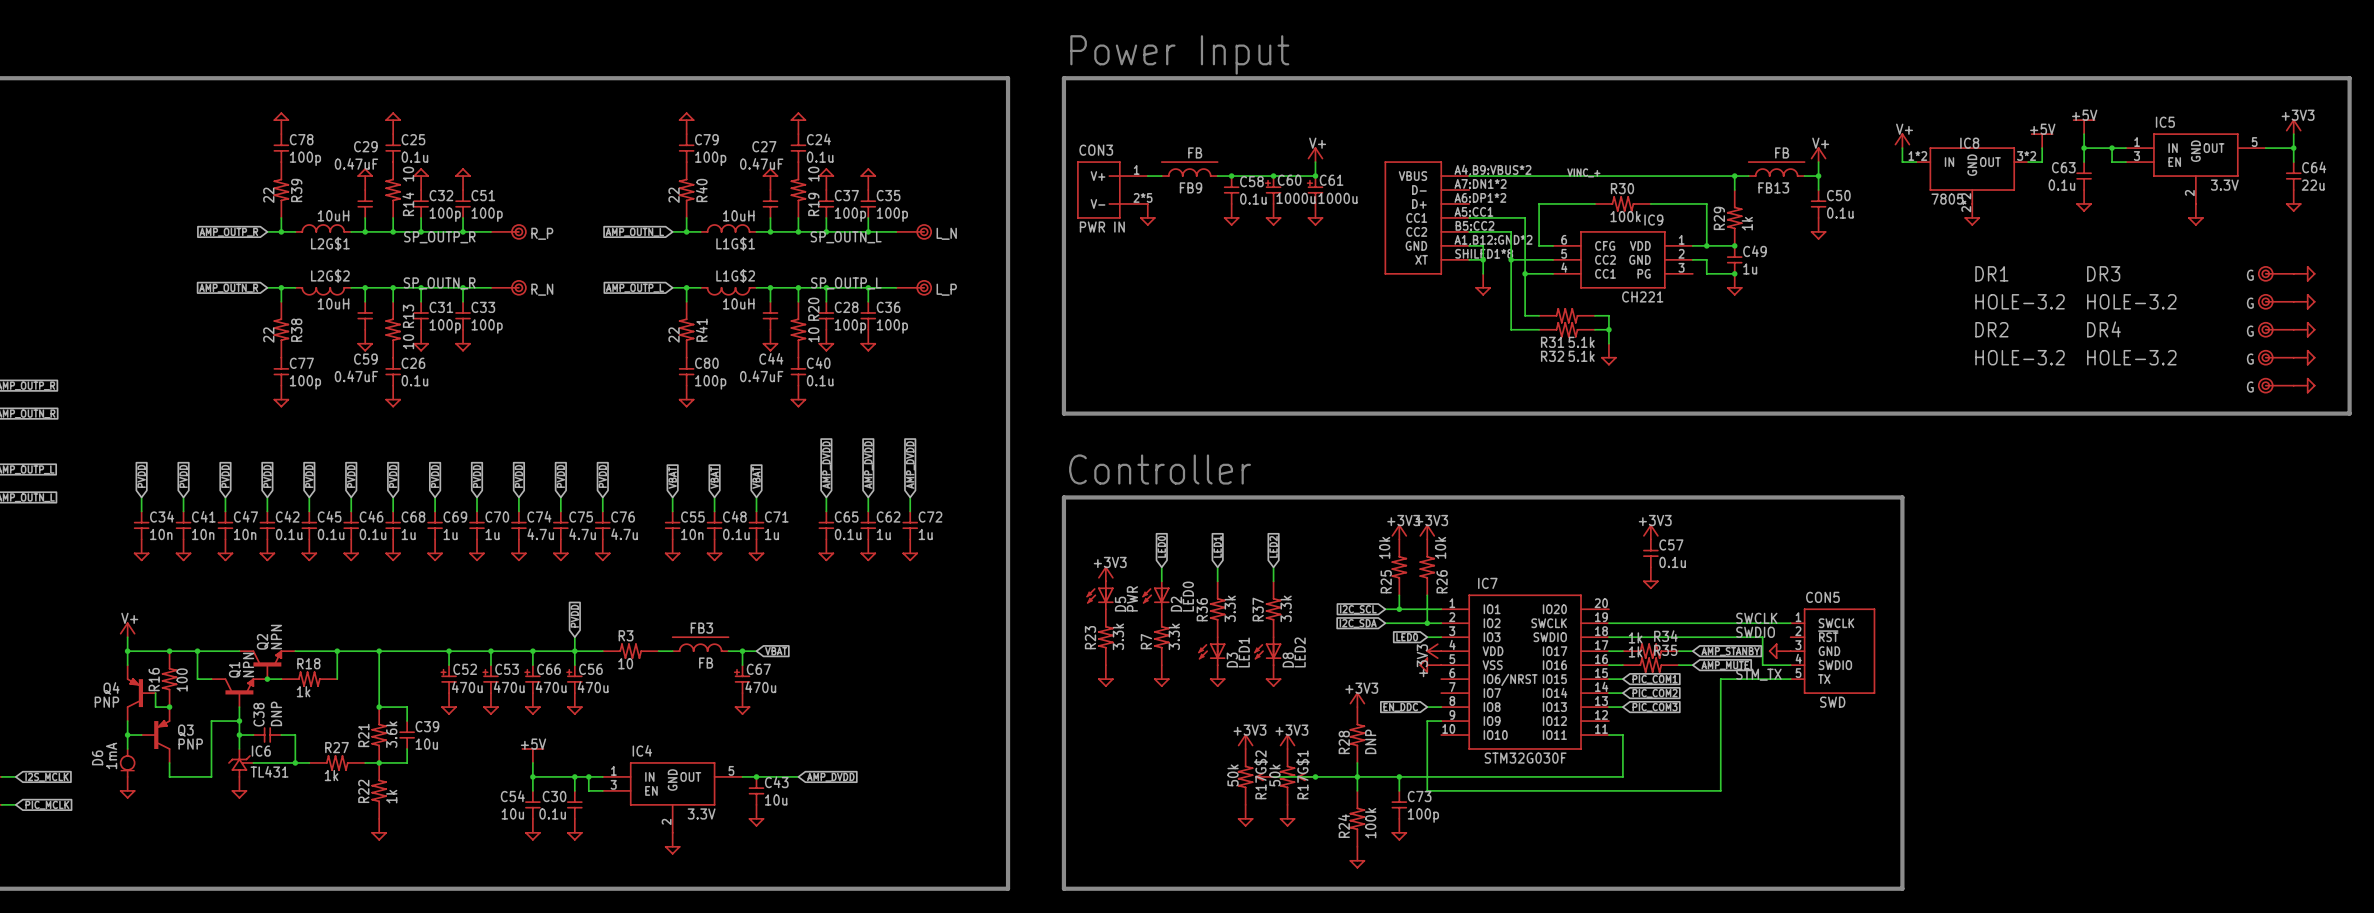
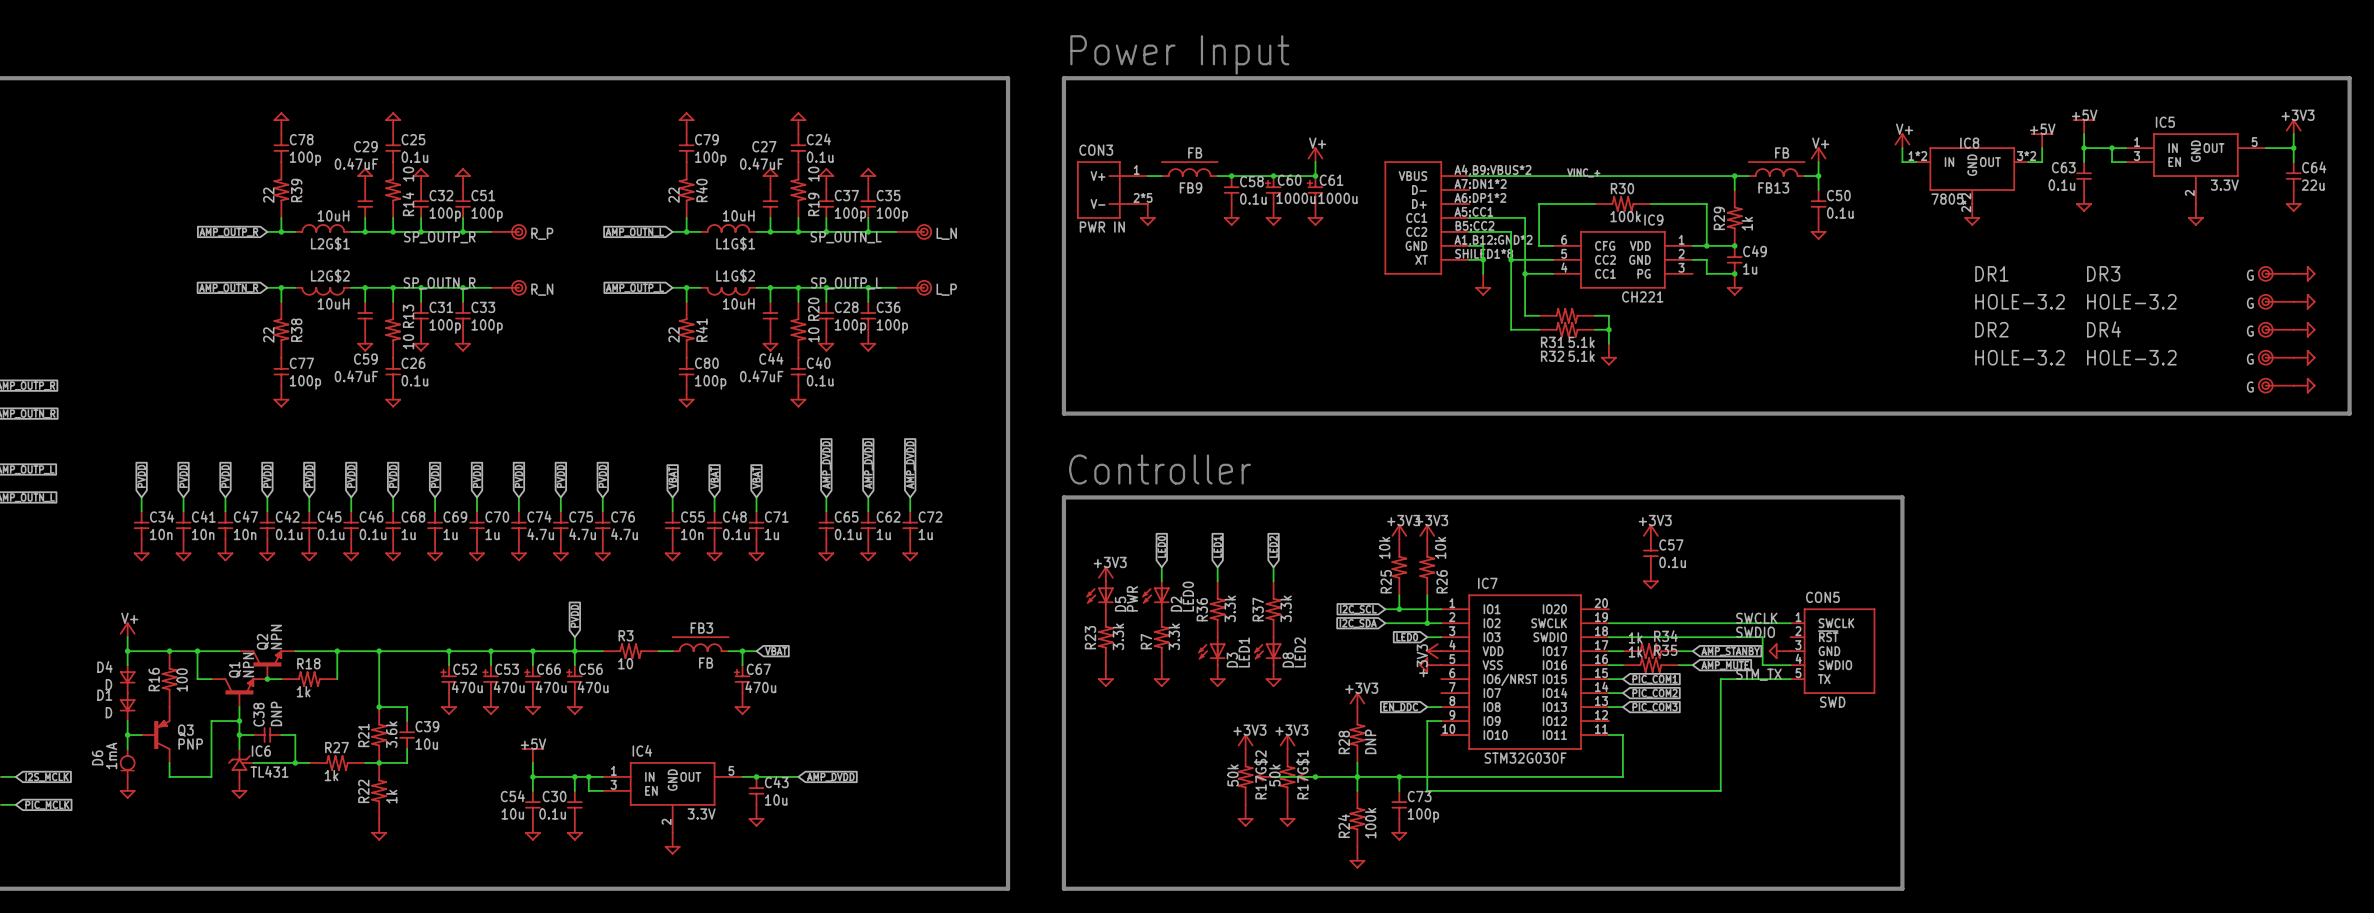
D4: none -> D (127, 679)
Q4: PNP (141, 693) -> none
wire: (155, 693) (155, 707) (169, 707) -> none
D1: none -> D (127, 707)
junction: (169, 707) -> none

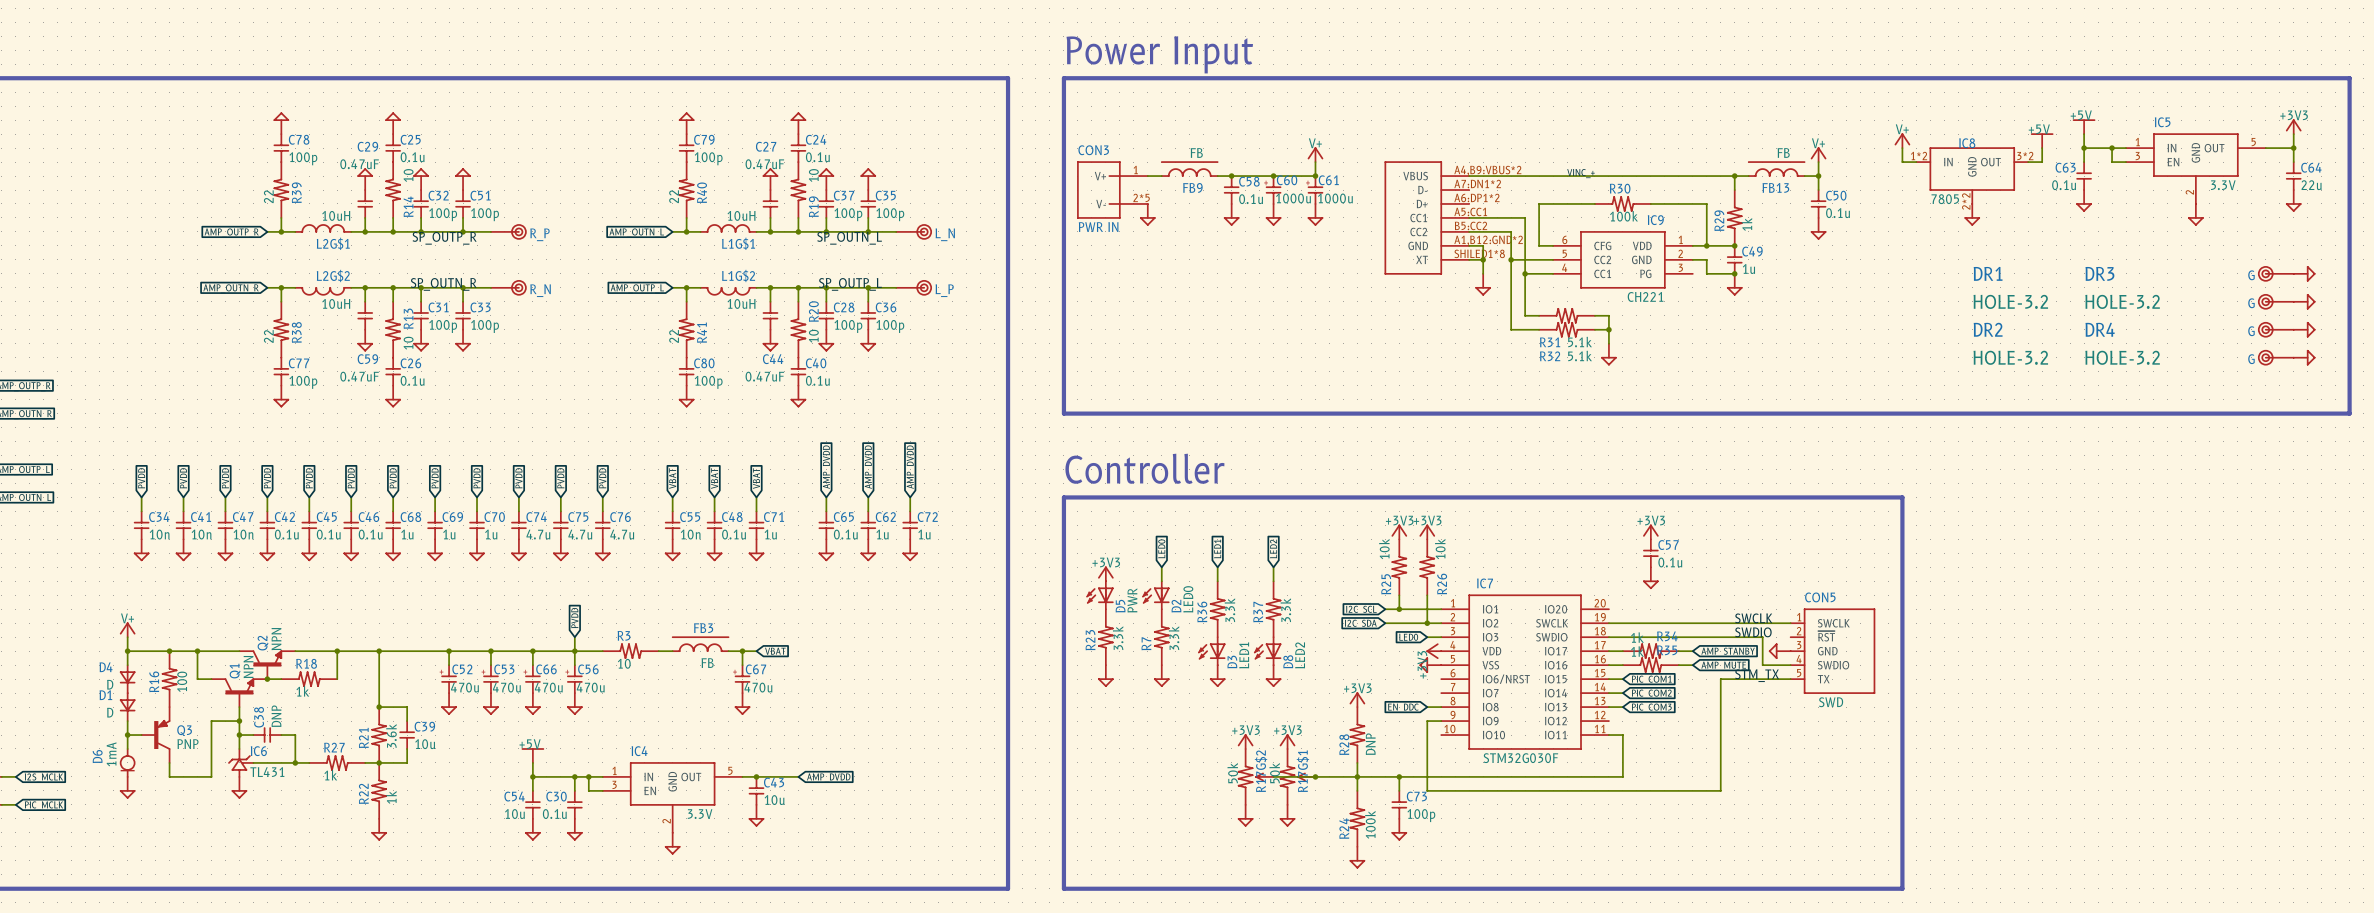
part: G (2275, 385) -> none
power symbol: (2304, 385) -> none

